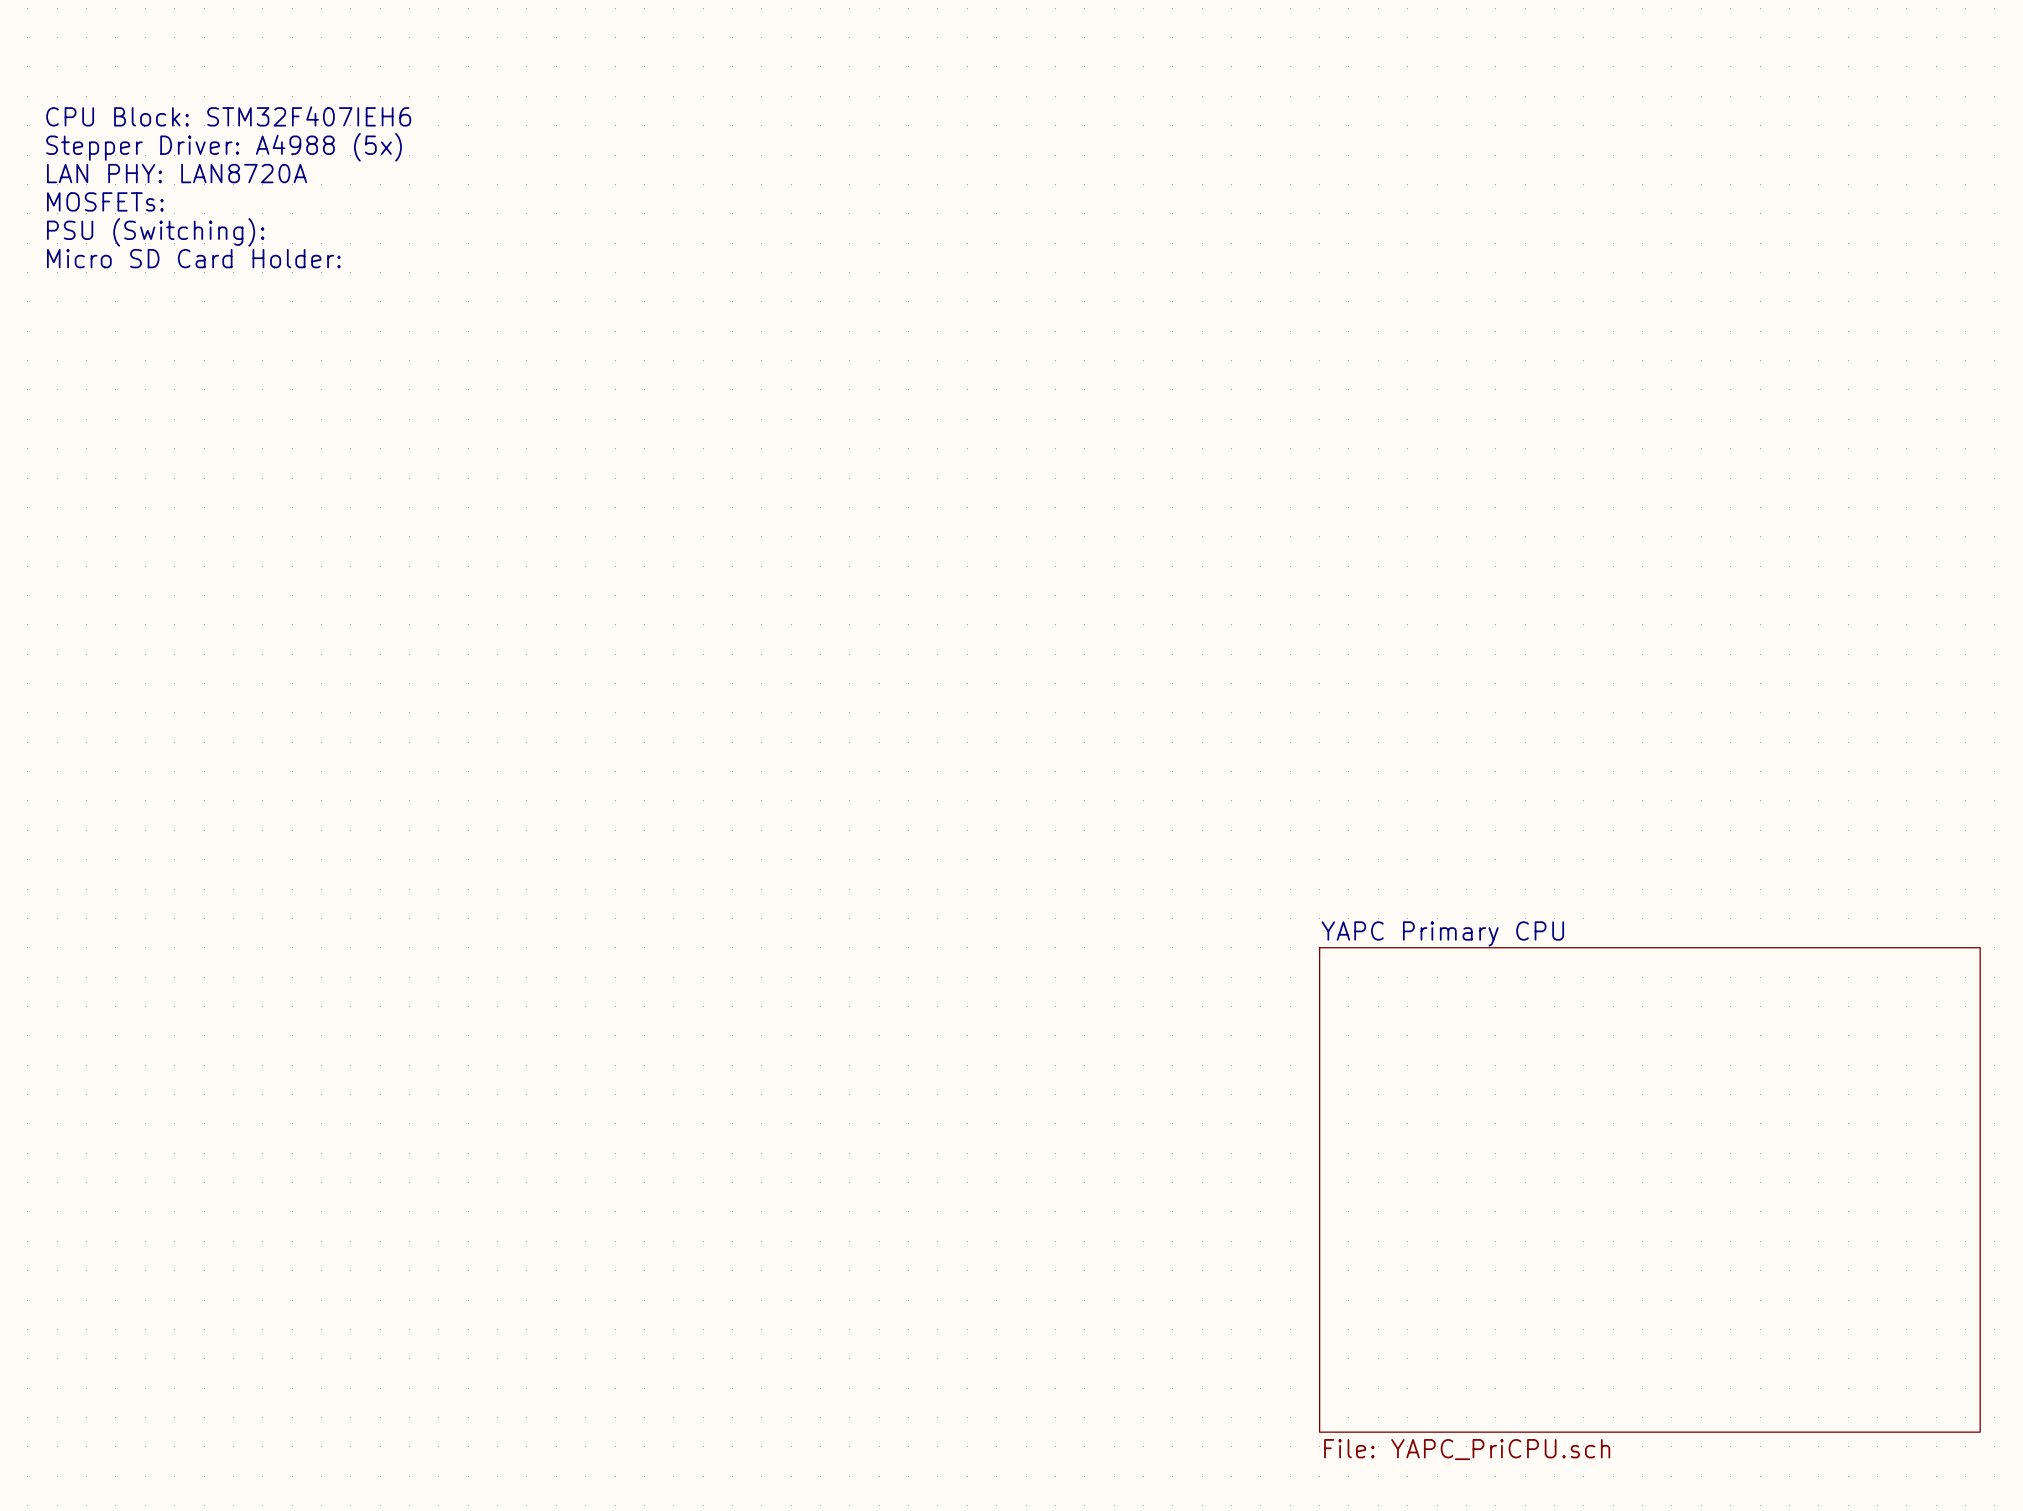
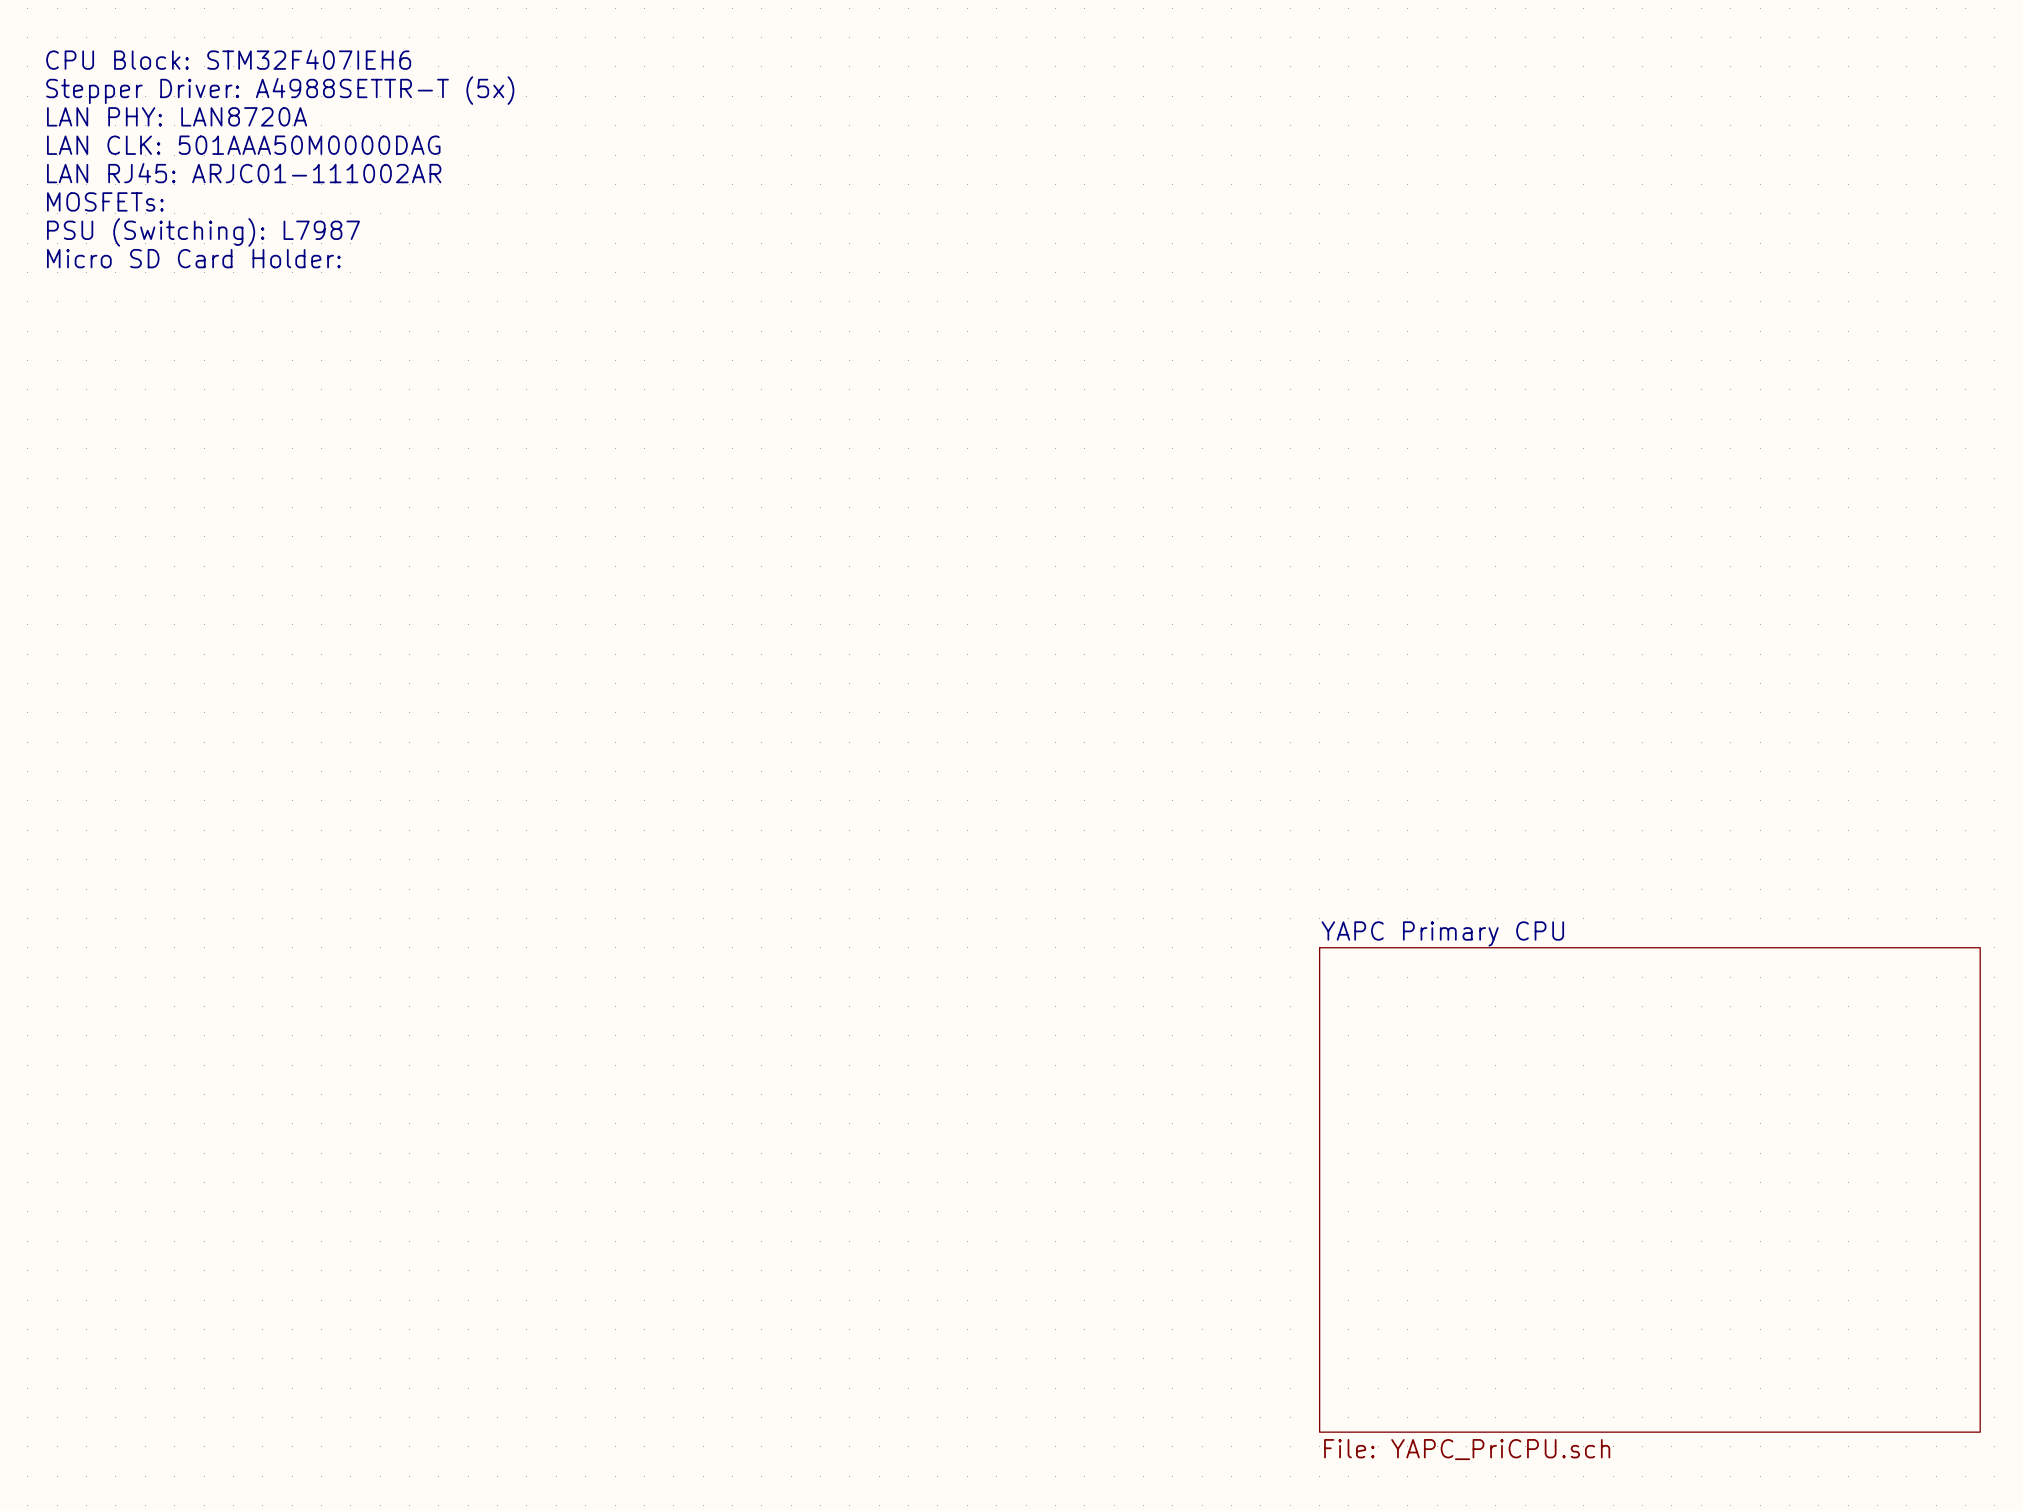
text: none -> CPU Block: STM32F407IEH6 (228, 59)
text: none -> Stepper Driver: A4988SETTR-T (5x) (280, 90)
text: CPU Block: STM32F407IEH6 (228, 116) -> LAN PHY: LAN8720A (177, 116)
text: Stepper Driver: A4988 (5x) (224, 147) -> LAN CLK: 501AAA50M0000DAG (243, 145)
text: LAN PHY: LAN8720A (177, 173) -> LAN RJ45: ARJC01-111002AR (244, 173)
text: PSU (Switching): (155, 232) -> PSU (Switching): L7987 (203, 232)

